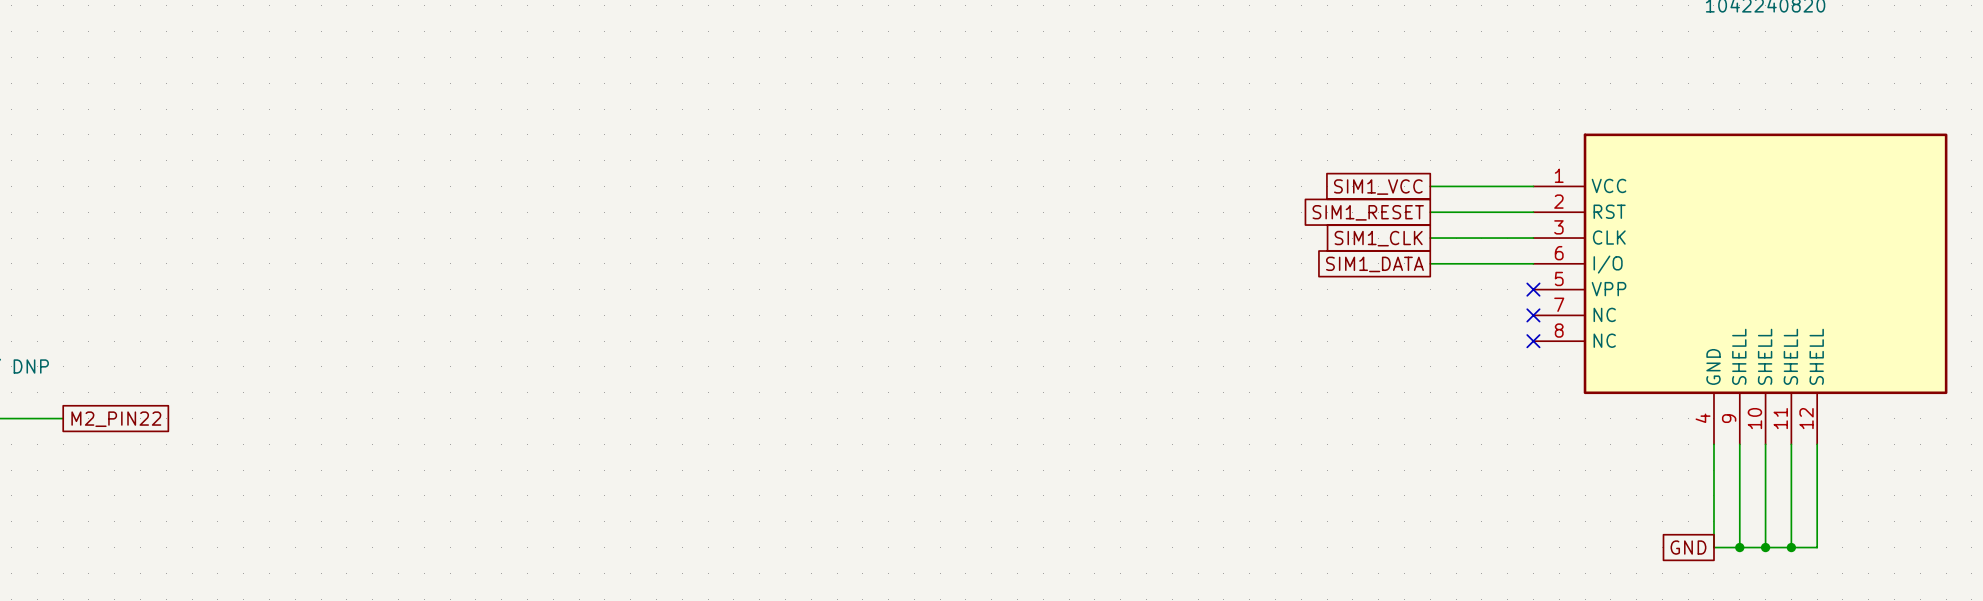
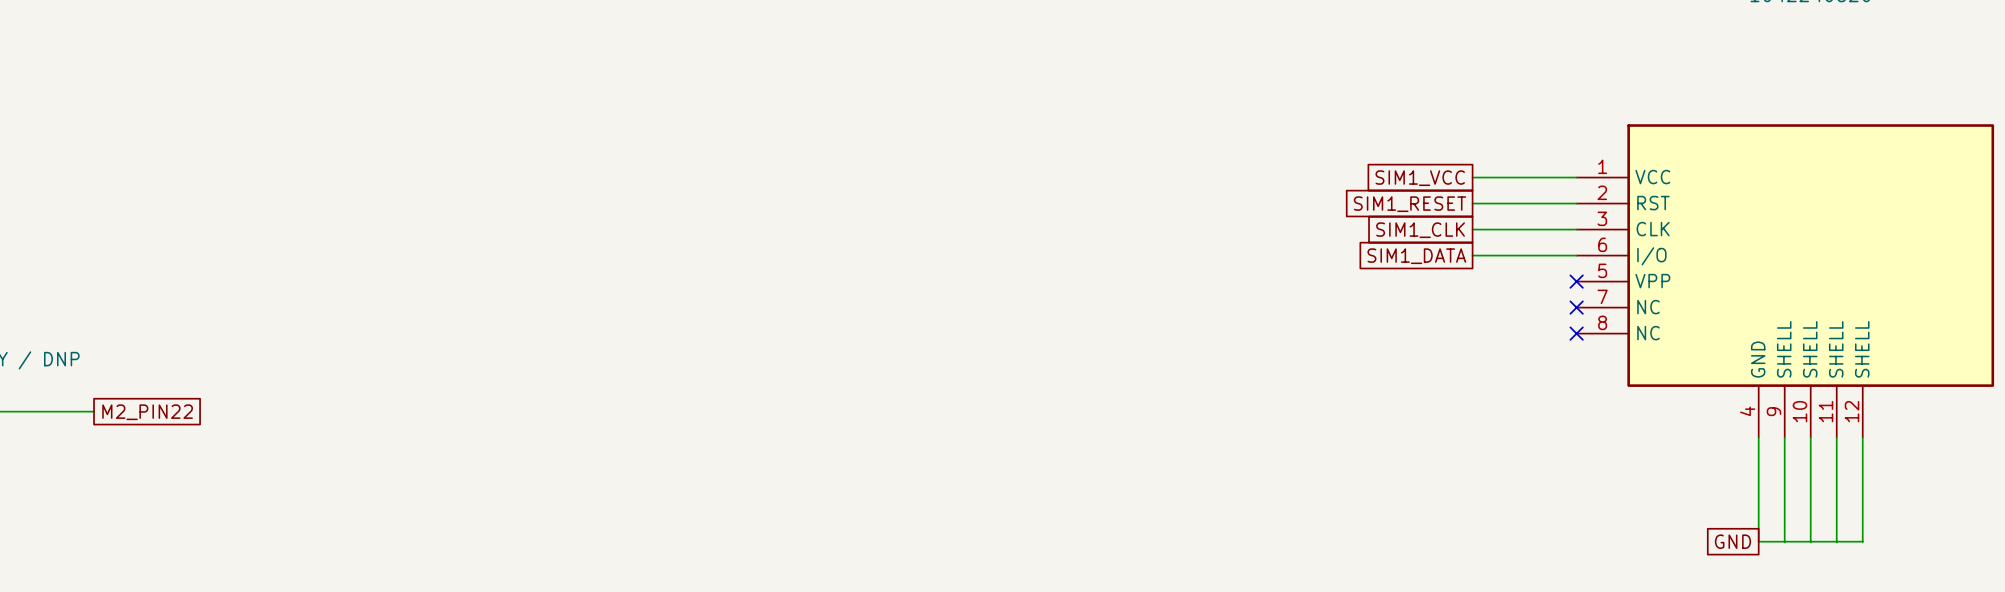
junction: (1739, 547) -> none
junction: (1765, 547) -> none
junction: (1791, 547) -> none

